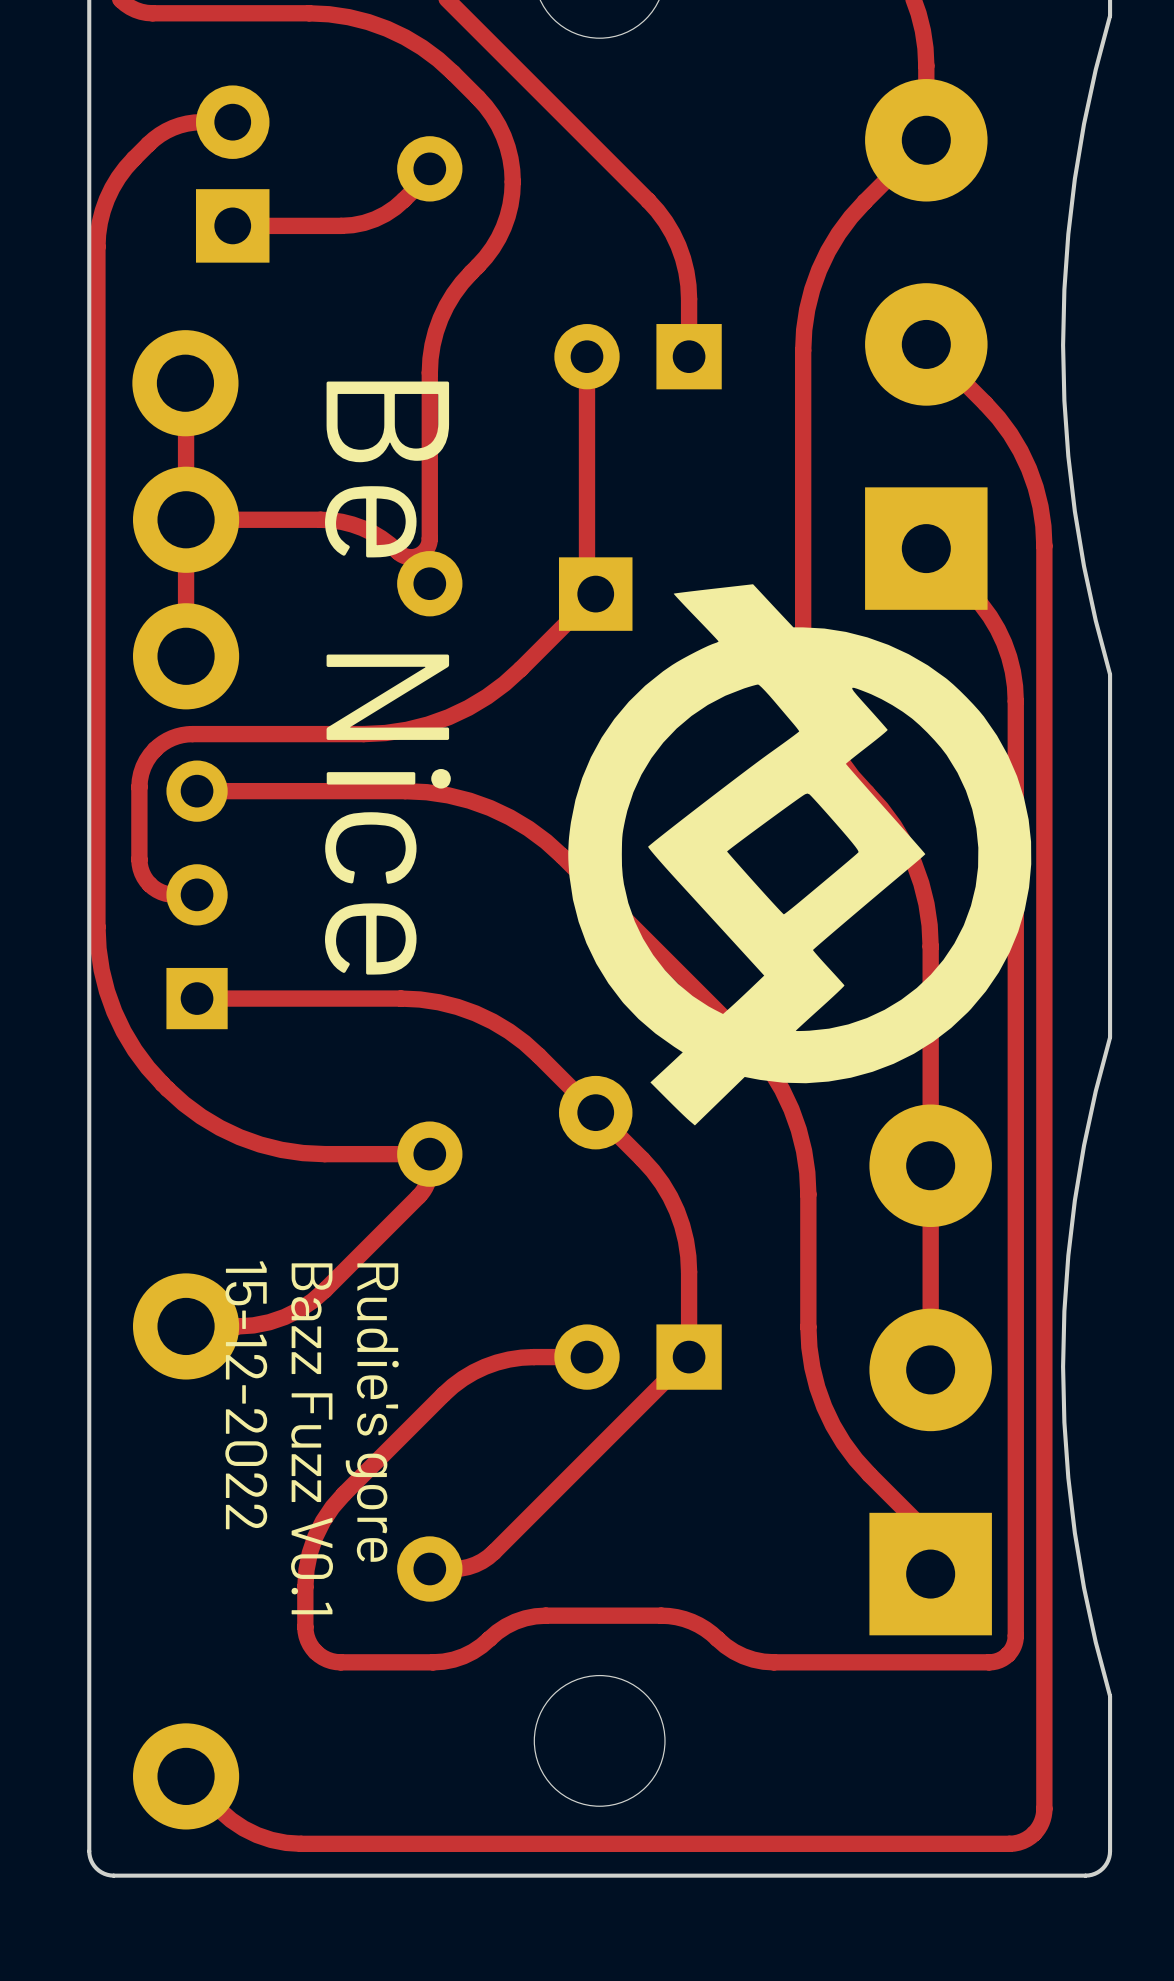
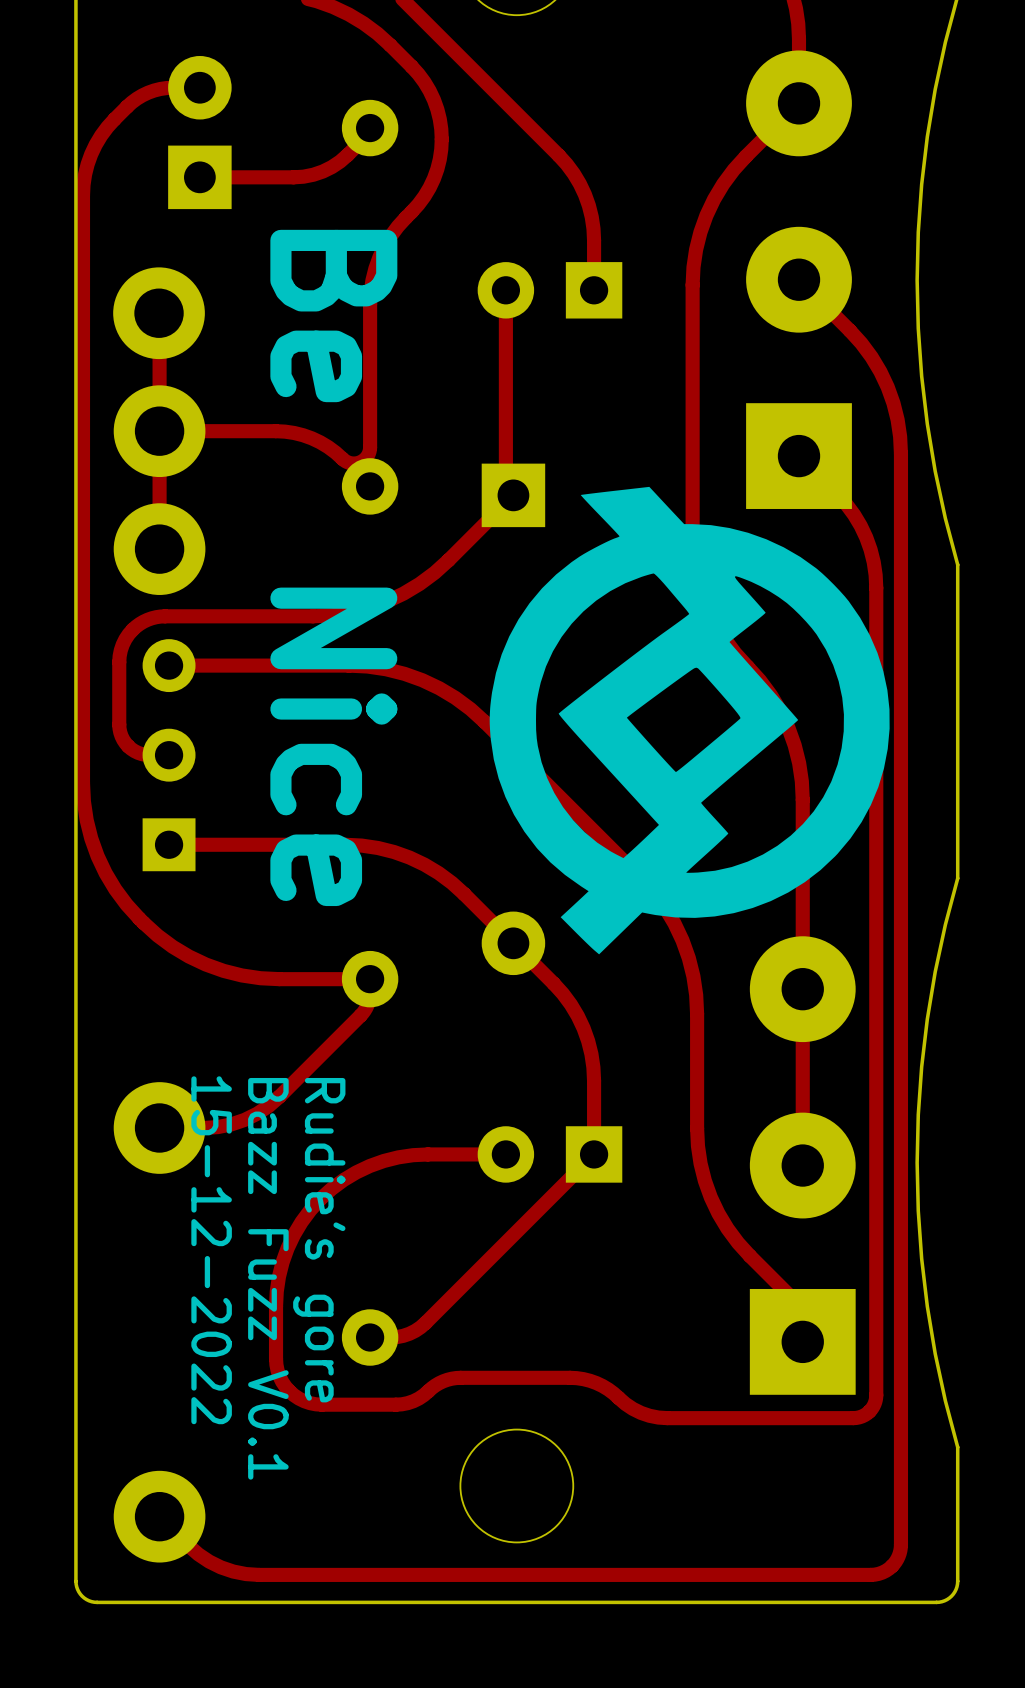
top track: (533, 1357) (509, 1359) (484, 1366) (452, 1386) (332, 1507) (315, 1536) (309, 1553) (305, 1587) (305, 1626) (308, 1640) (312, 1648) (319, 1655) (331, 1661) (433, 1662) (453, 1659) (472, 1651) (497, 1632) (515, 1621) (545, 1615) -> (460, 1154) (413, 1155) (369, 1166) (331, 1188) (310, 1209) (293, 1234) (278, 1276) (276, 1306) (276, 1358) (279, 1376) (289, 1391) (298, 1398) (315, 1404) (401, 1404) (418, 1398) (443, 1381) (456, 1378) (470, 1377)

